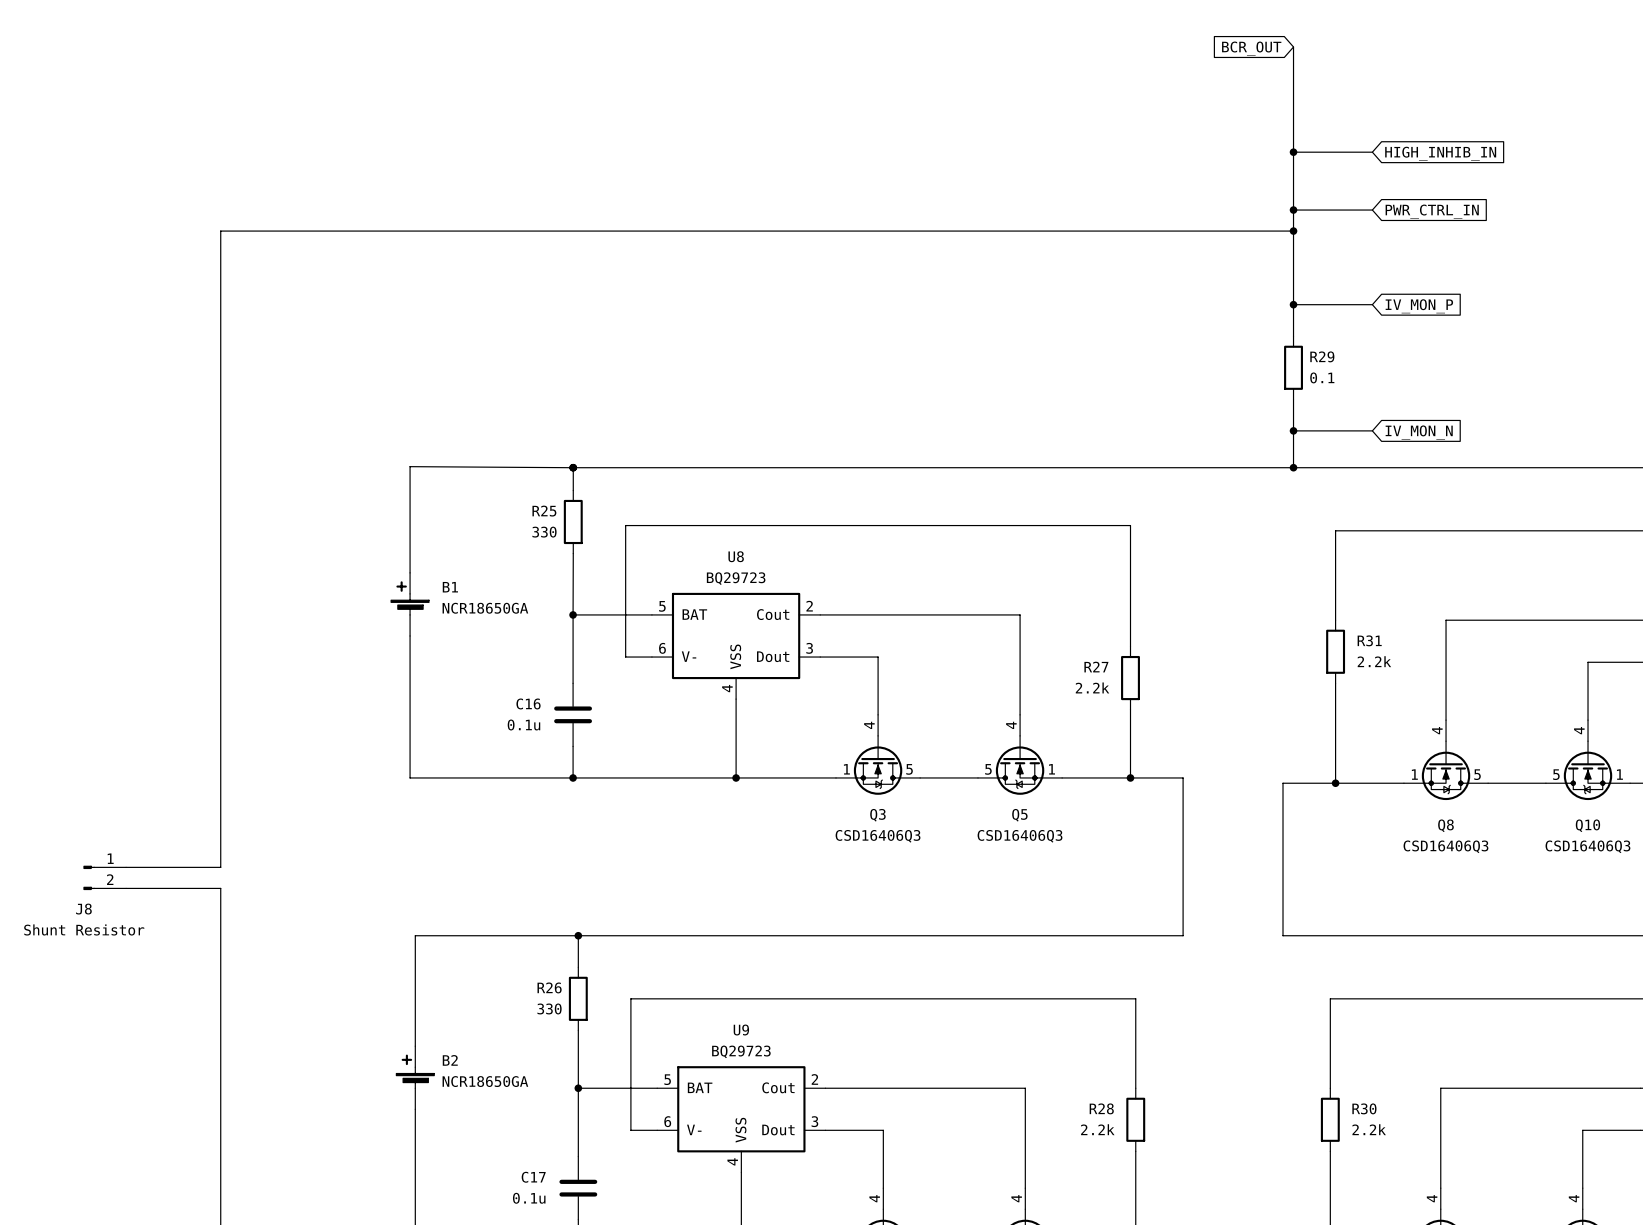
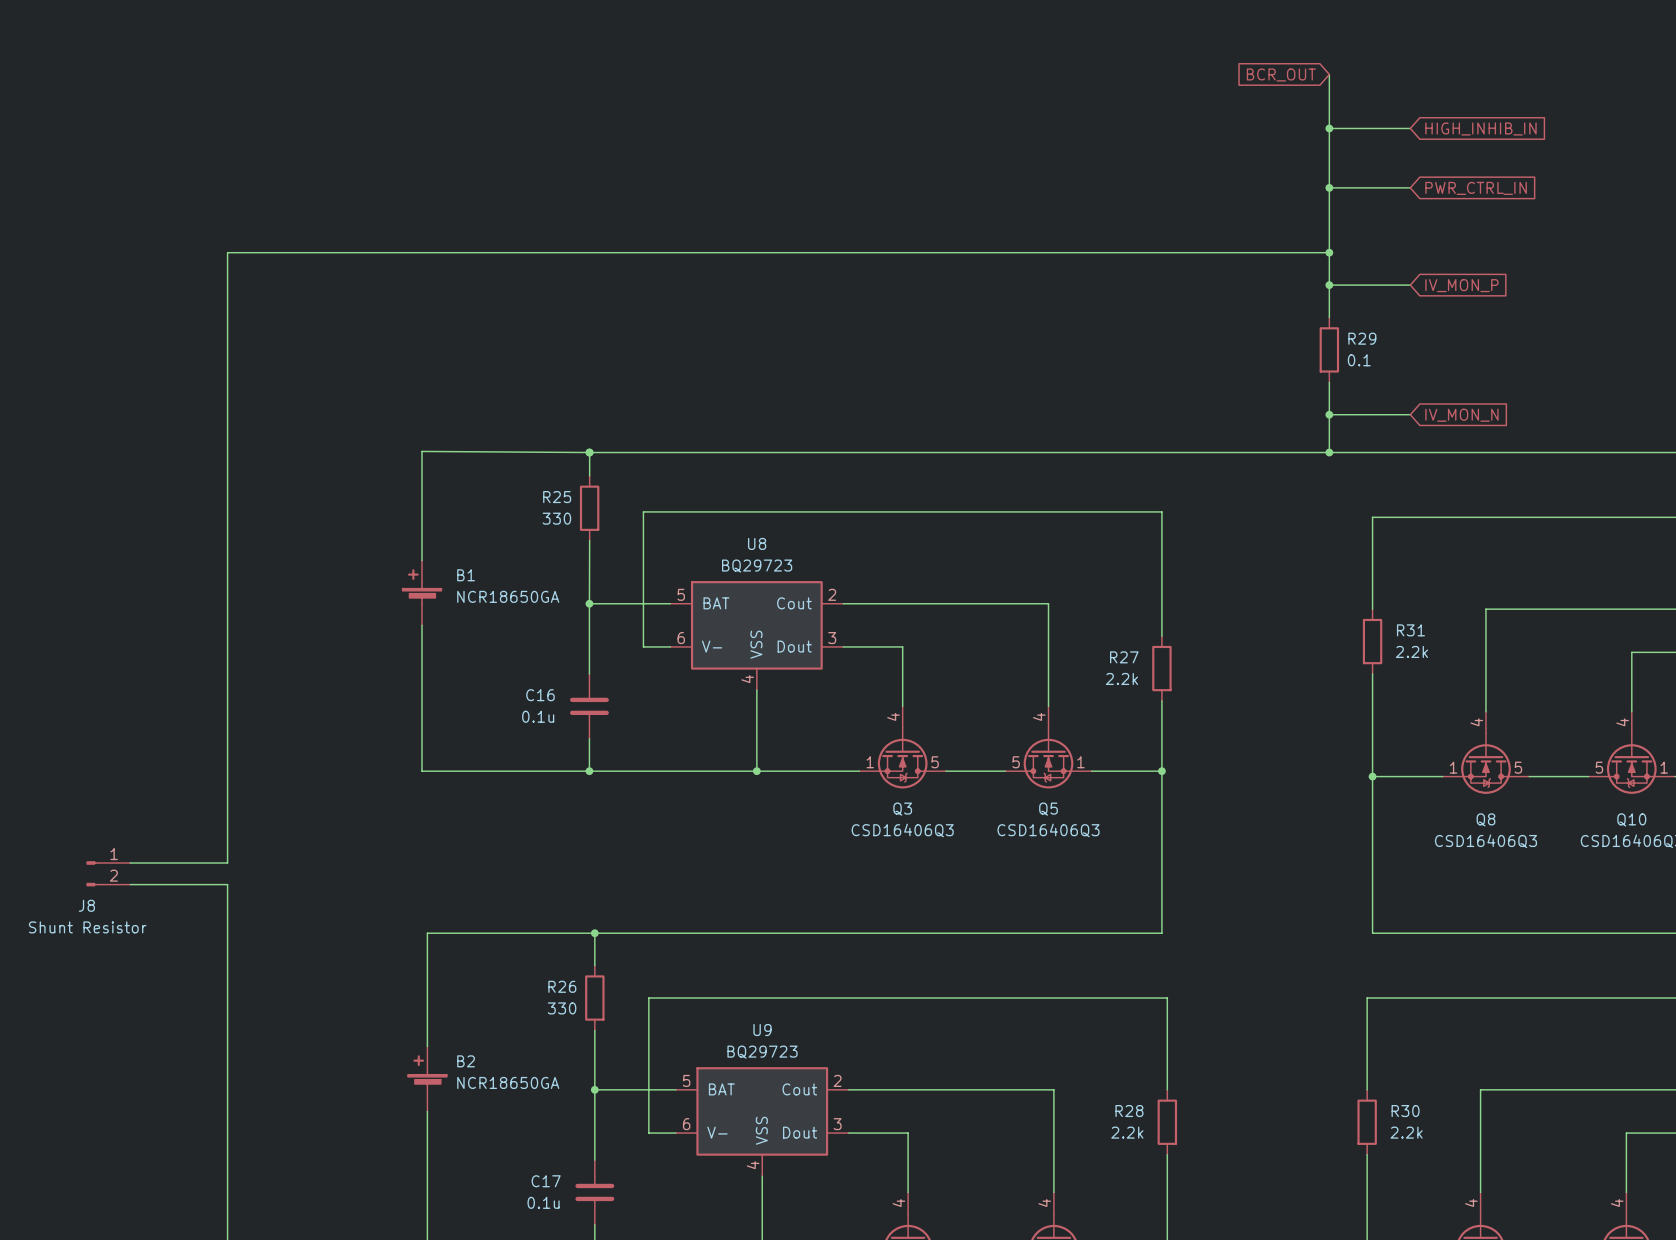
wire: (1293, 47) (1293, 99) -> none
global label position: BCR_OUT (1251, 48) -> BCR_OUT (1281, 74)
wire: (1293, 231) (220, 231) (220, 273) -> (1329, 252) (227, 252)
junction position: (1293, 231) -> (1329, 252)
wire: (1130, 777) (1183, 777) (1183, 935) (1130, 935) -> (1161, 771) (1161, 933)
wire: (1335, 783) (1283, 783) (1283, 935) (1335, 935) -> (1372, 776) (1372, 933)

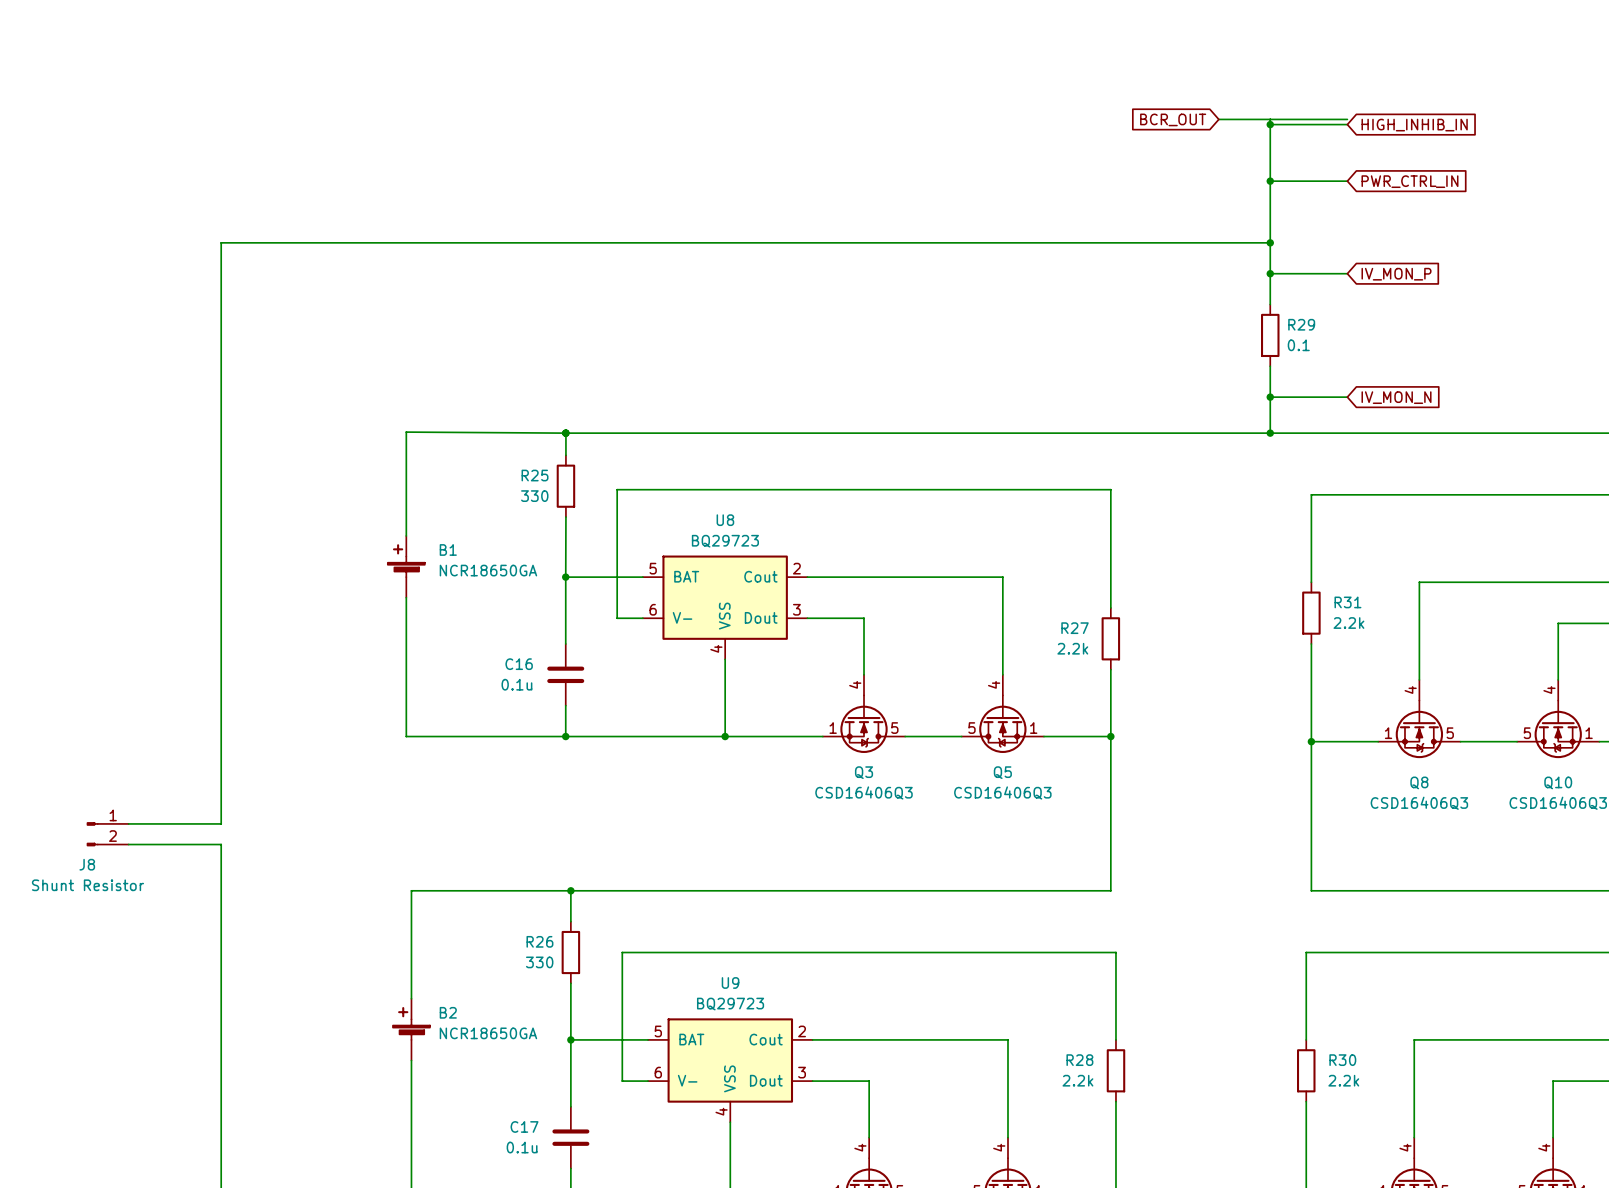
global label position: BCR_OUT (1281, 74) -> BCR_OUT (1173, 119)
wire: (1329, 74) (1329, 123) -> none
wire: none -> (1218, 119) (1347, 119)

